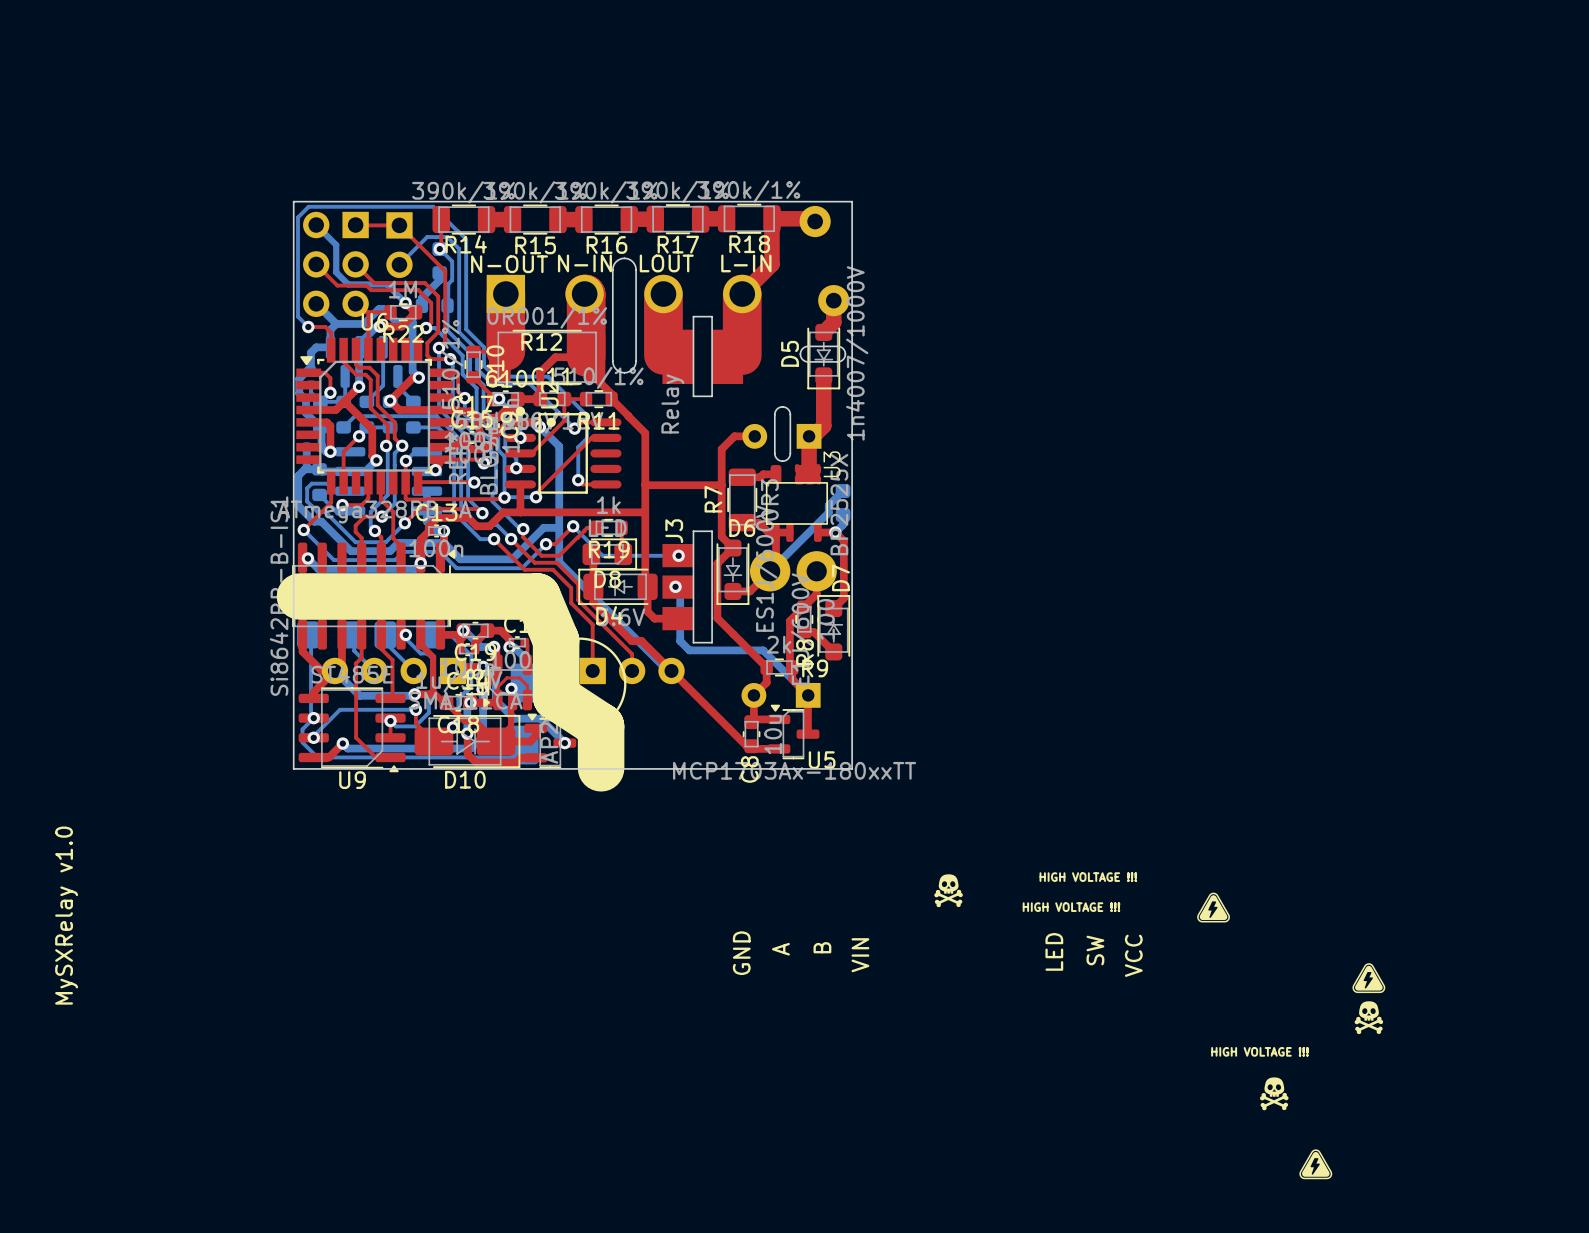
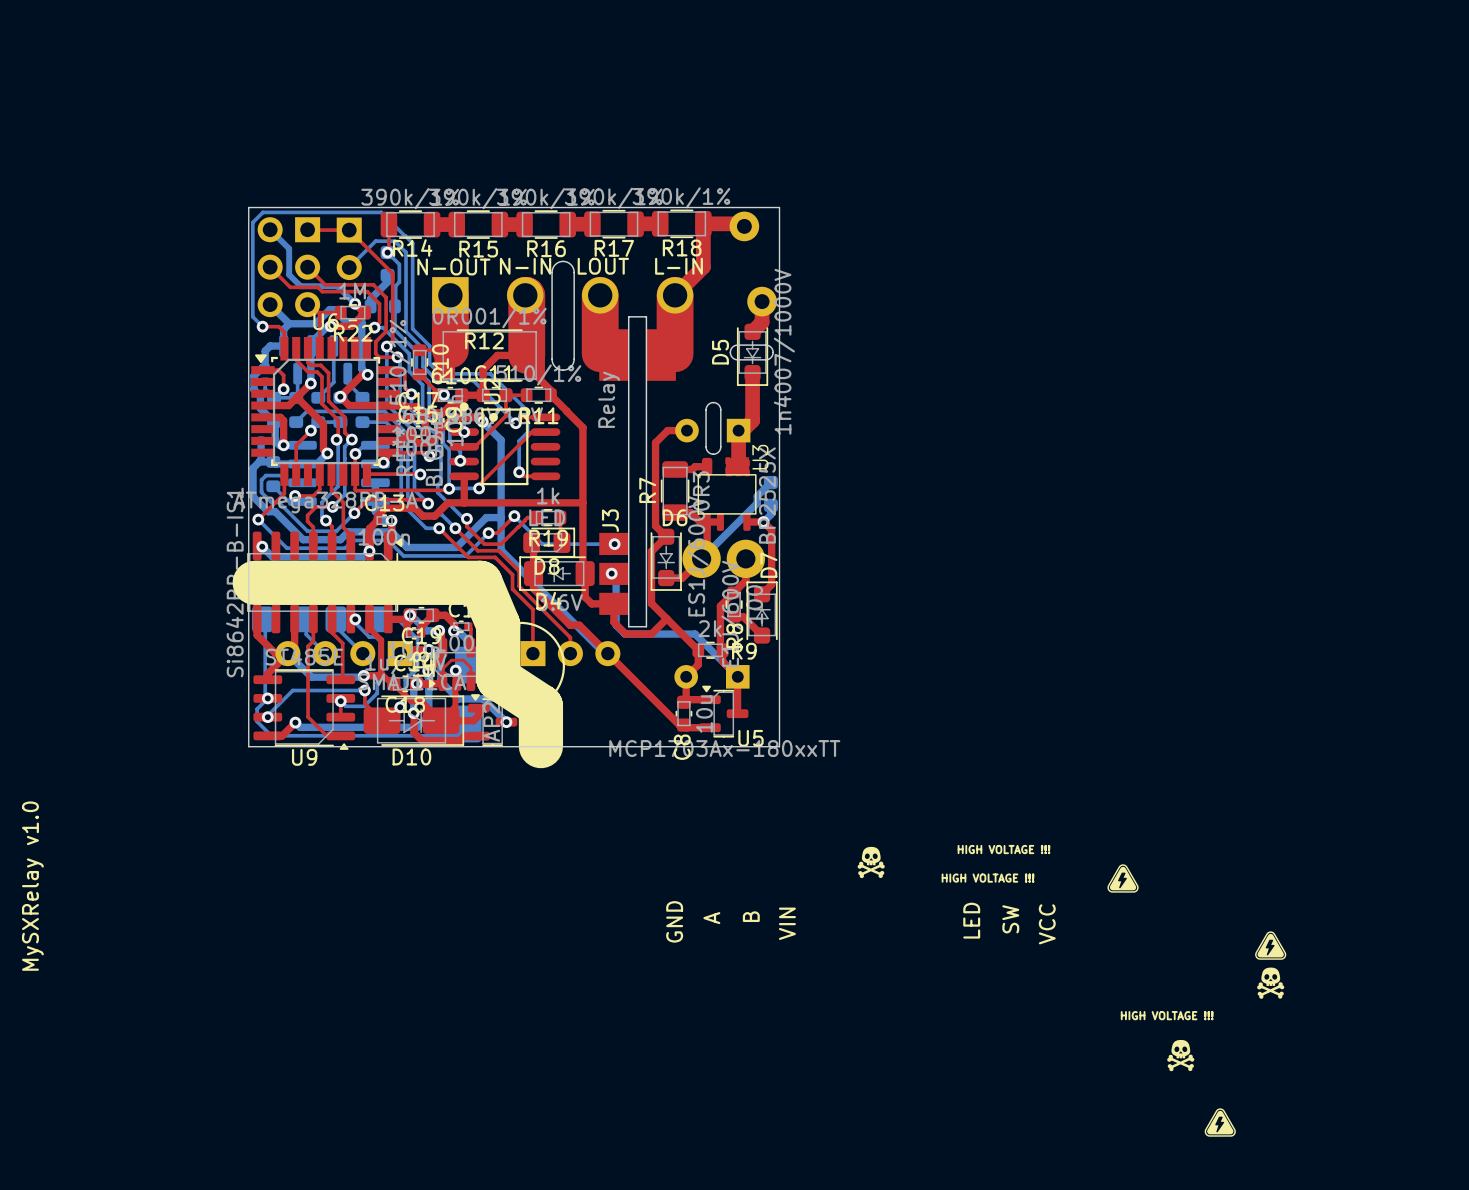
J3 footprint: [662, 315, 744, 644] -> [599, 316, 676, 628]
top track: (645, 484) (721, 485) -> none
top track: none -> (613, 603) (613, 622) (625, 634) (651, 634) (666, 618)

